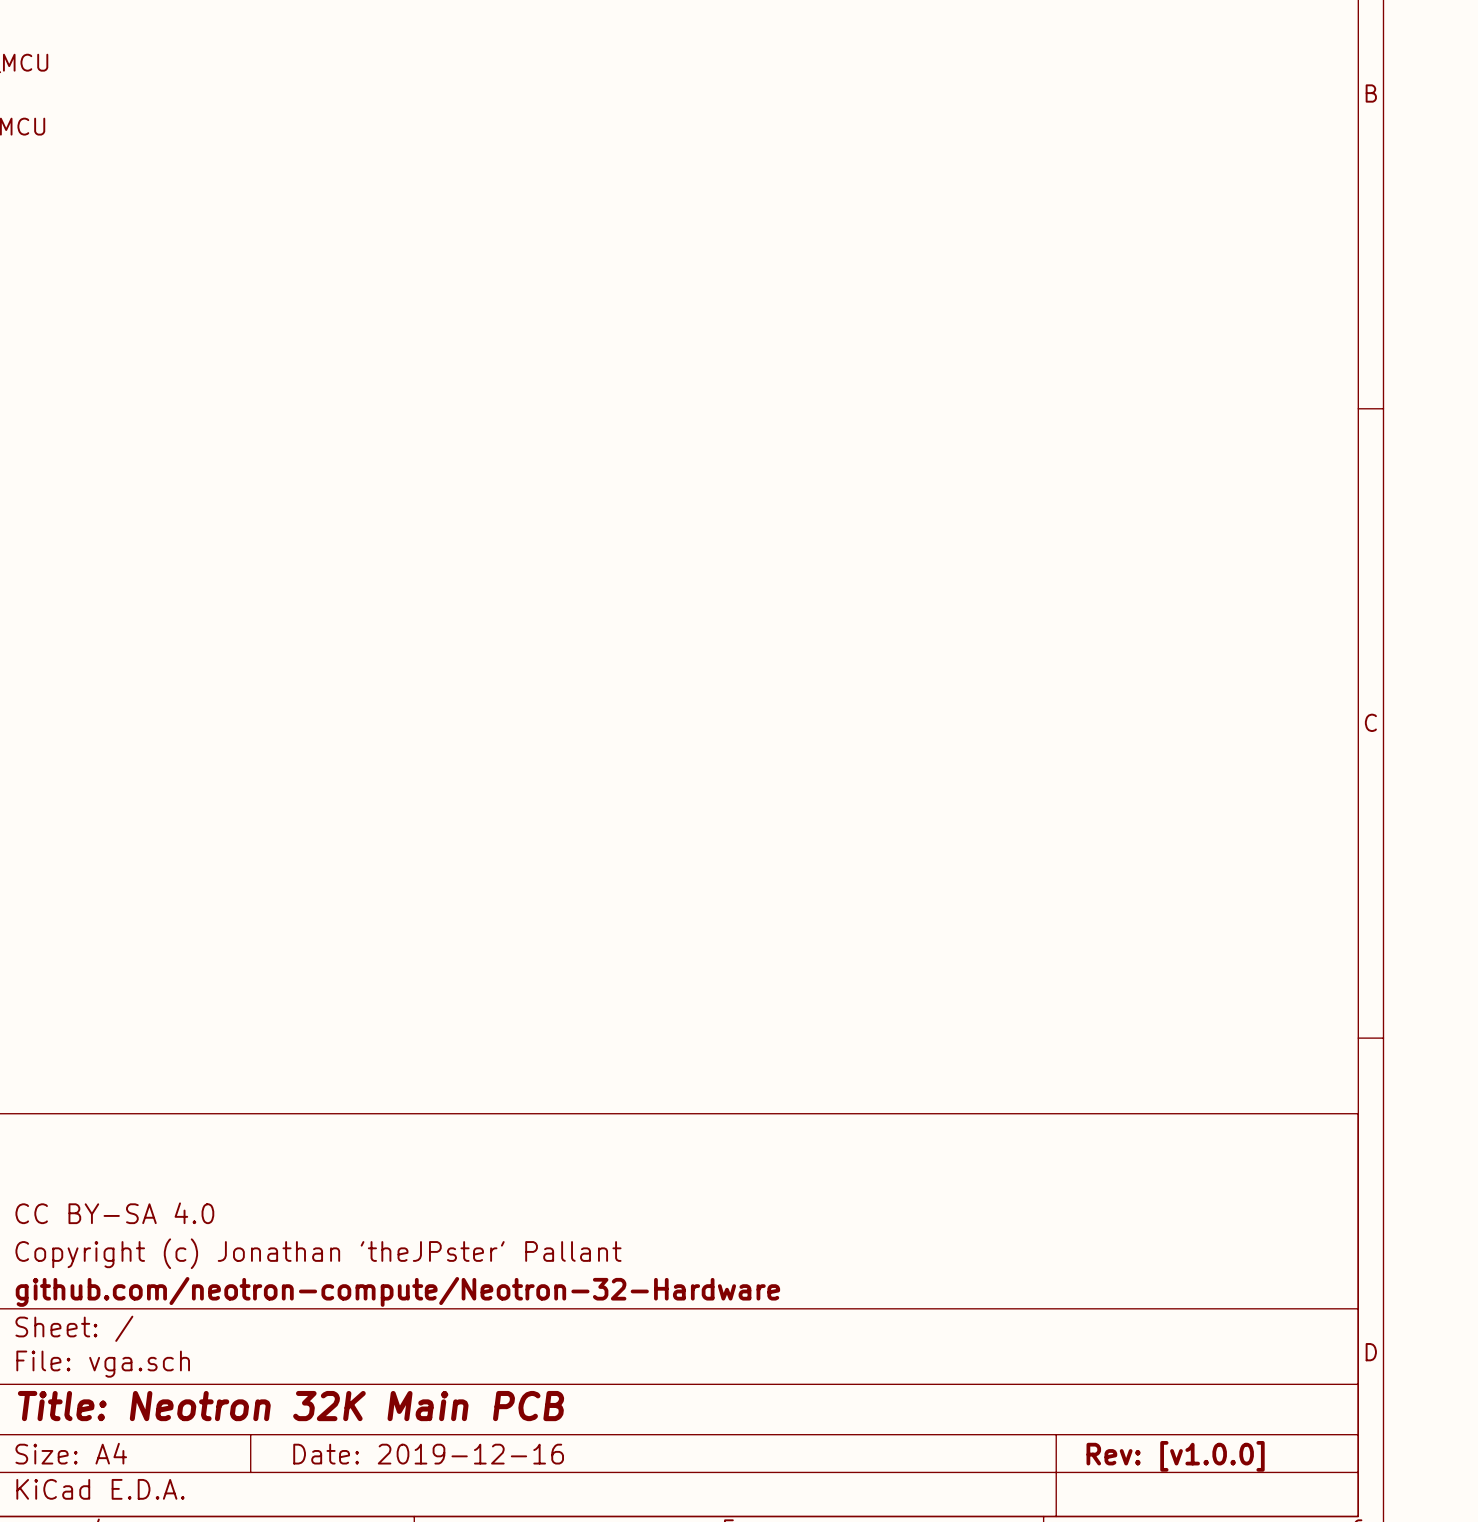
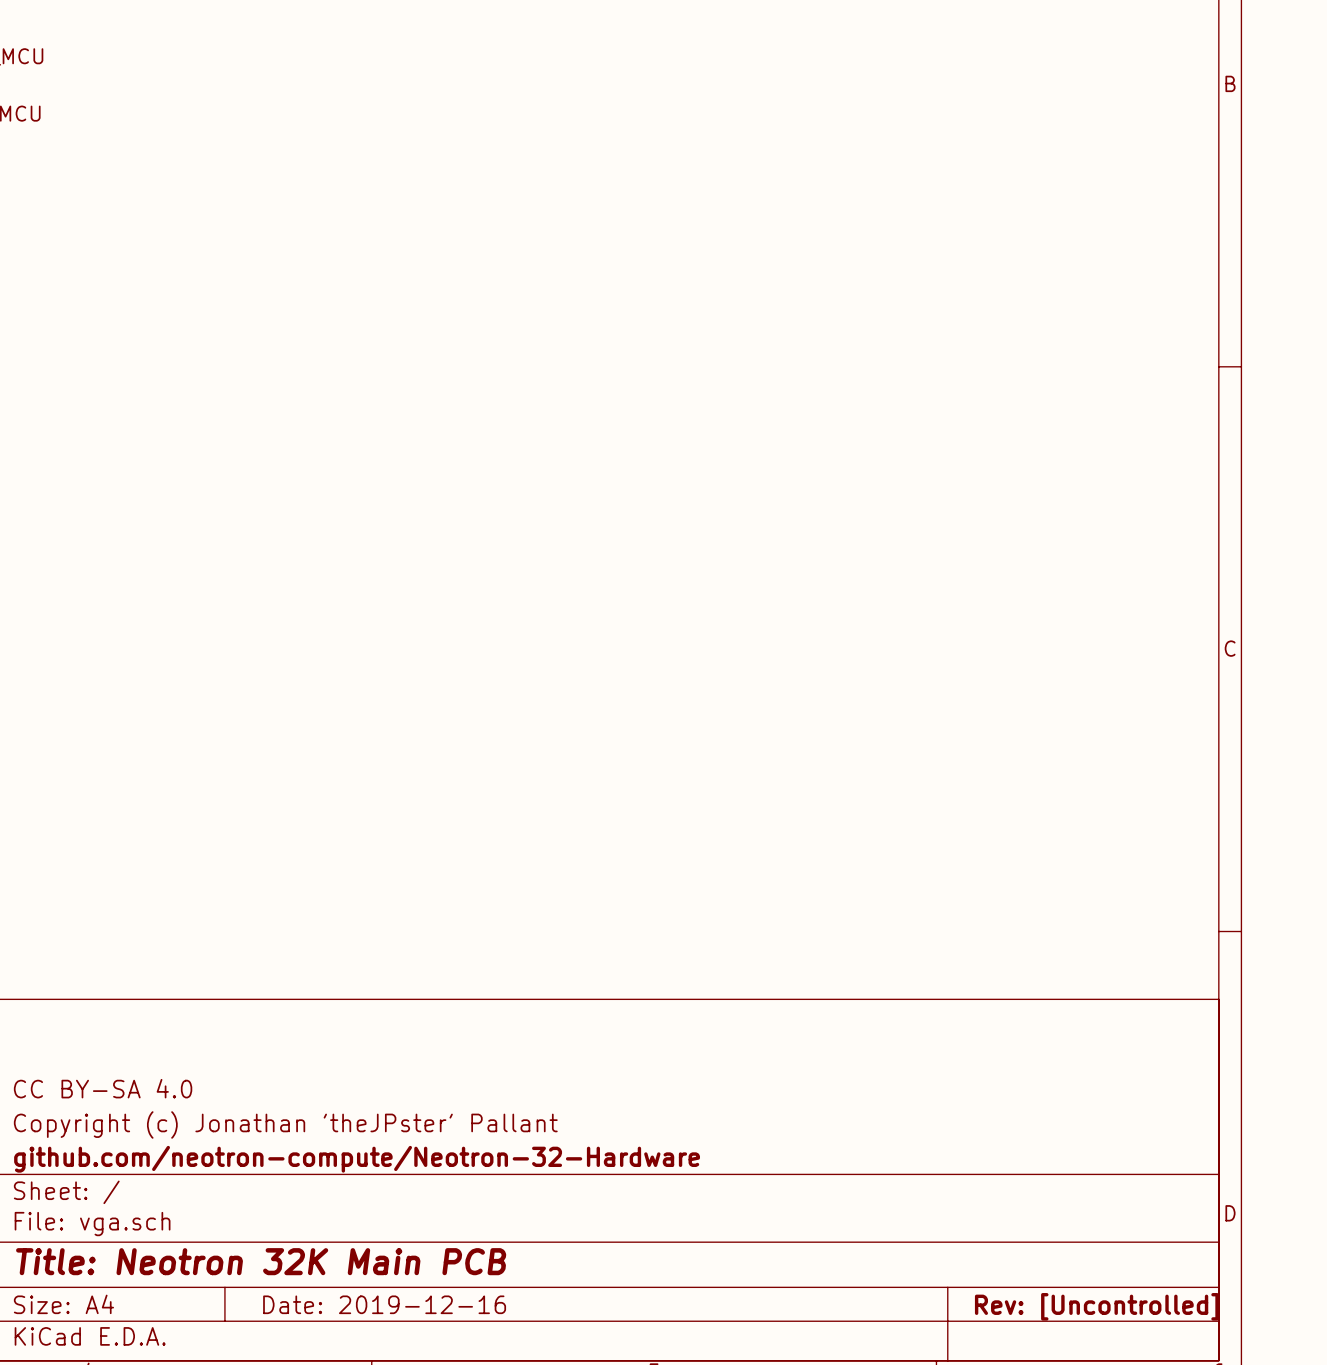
title block: Rev: [v1.0.0] (1175, 1456) -> Rev: [Uncontrolled] (1096, 1306)

